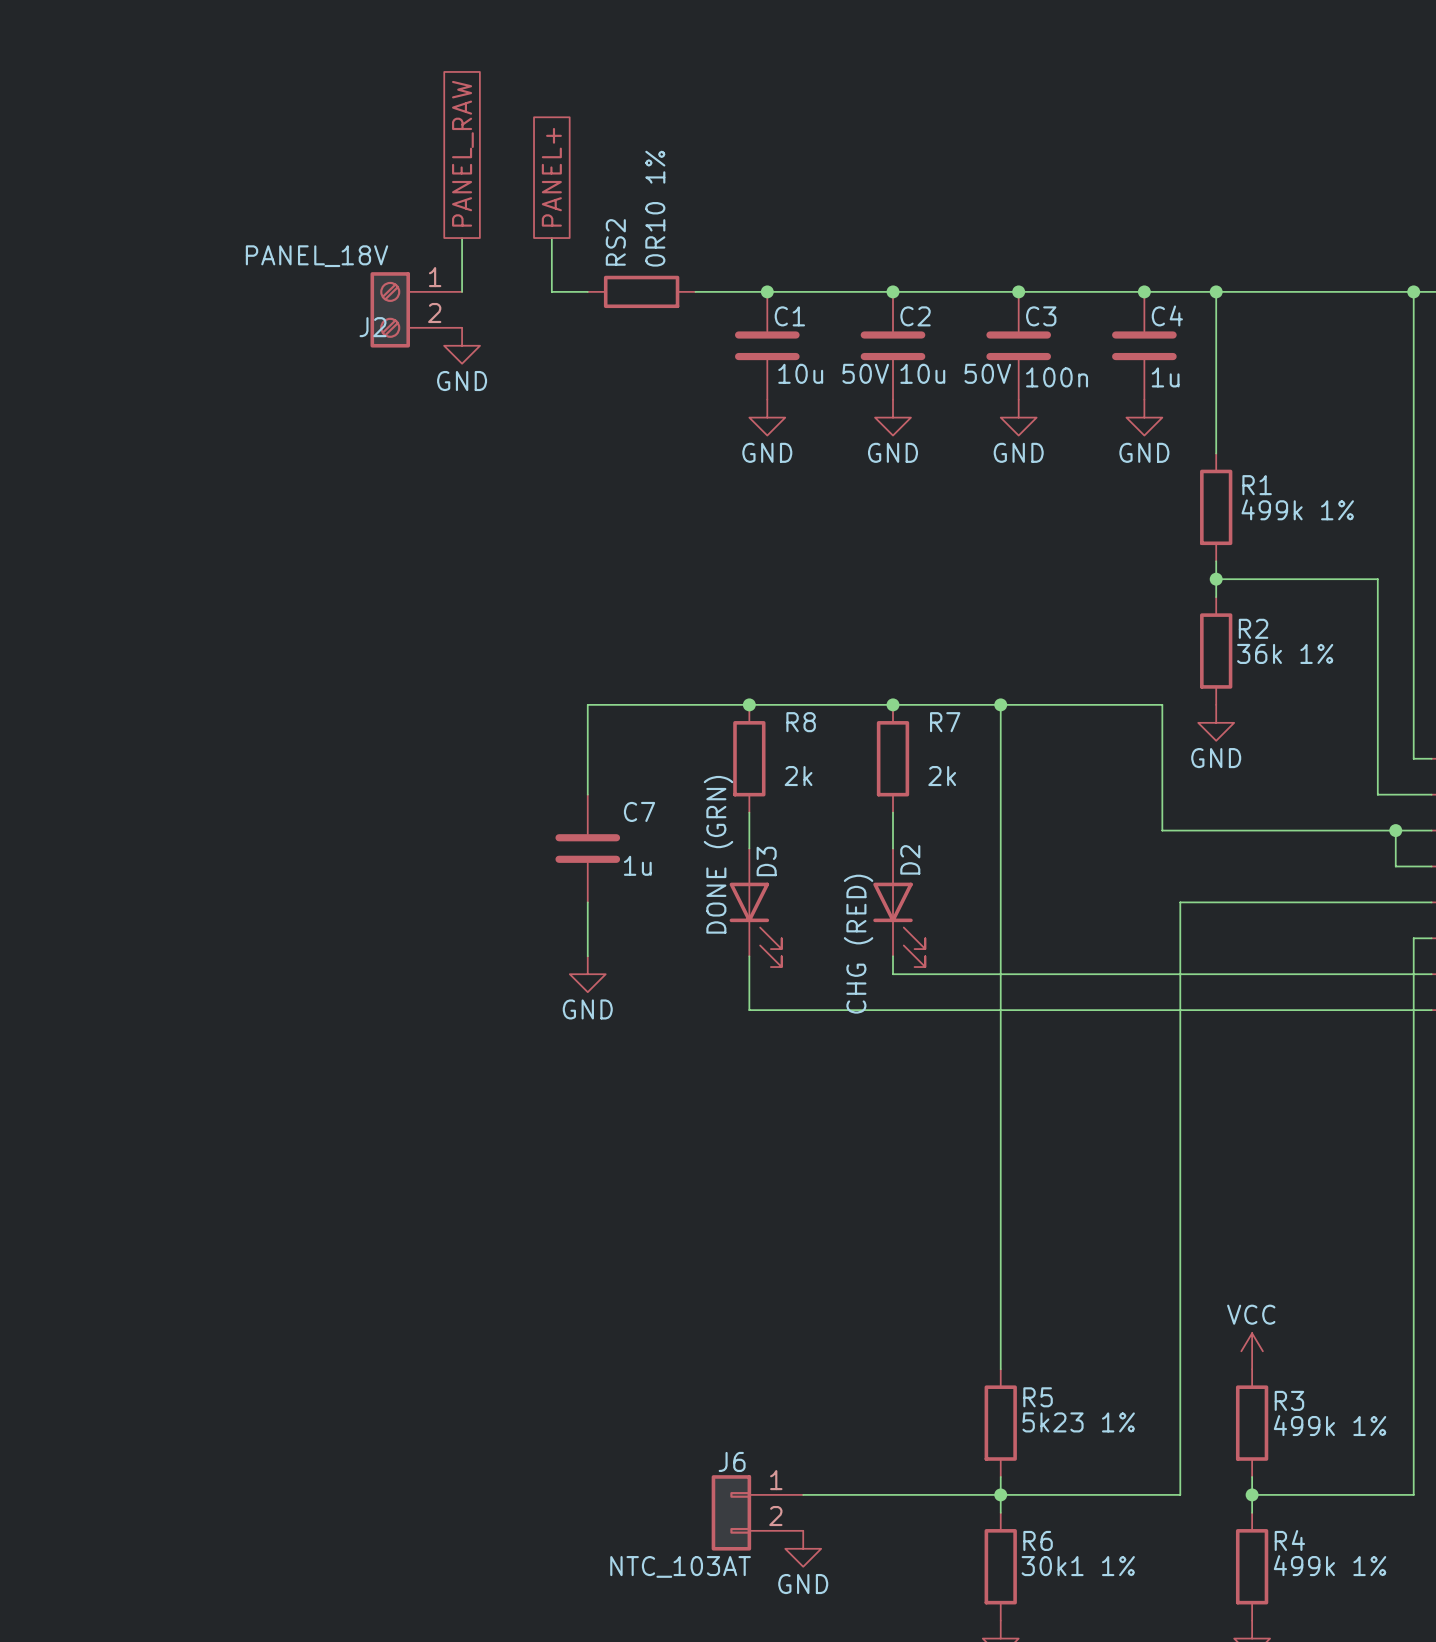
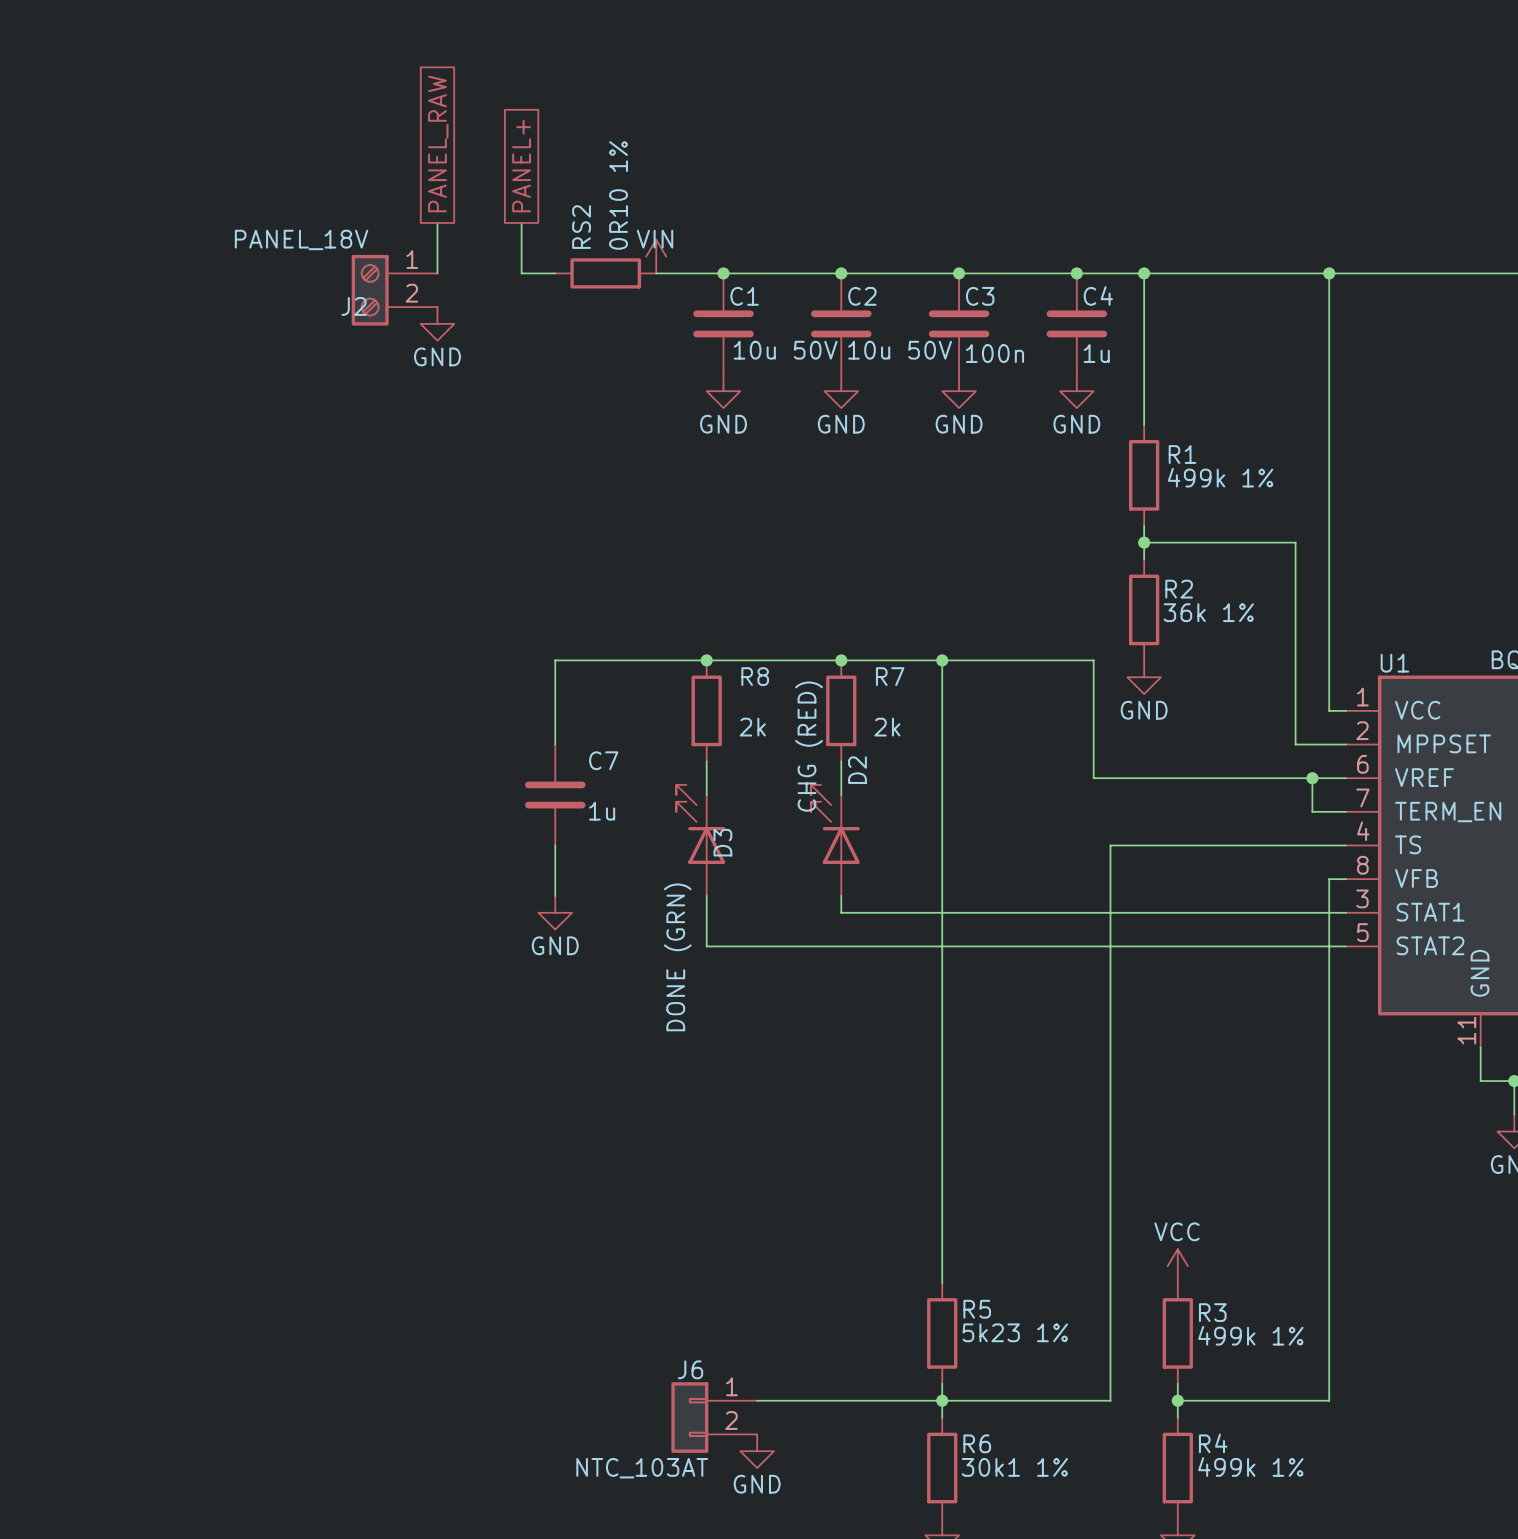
power symbol: none -> VIN (656, 256)
D3 value position: DONE (GRN) (718, 854) -> DONE (GRN) (677, 957)
D2 name position: D2 (910, 859) -> D2 (857, 770)
D3 name position: D3 (766, 861) -> D3 (722, 842)
D3 rotation: 0° (755, 924) -> 180° (700, 824)
D2 rotation: 0° (899, 924) -> 180° (835, 824)
D2 value position: CHG (RED) (858, 944) -> CHG (RED) (809, 746)

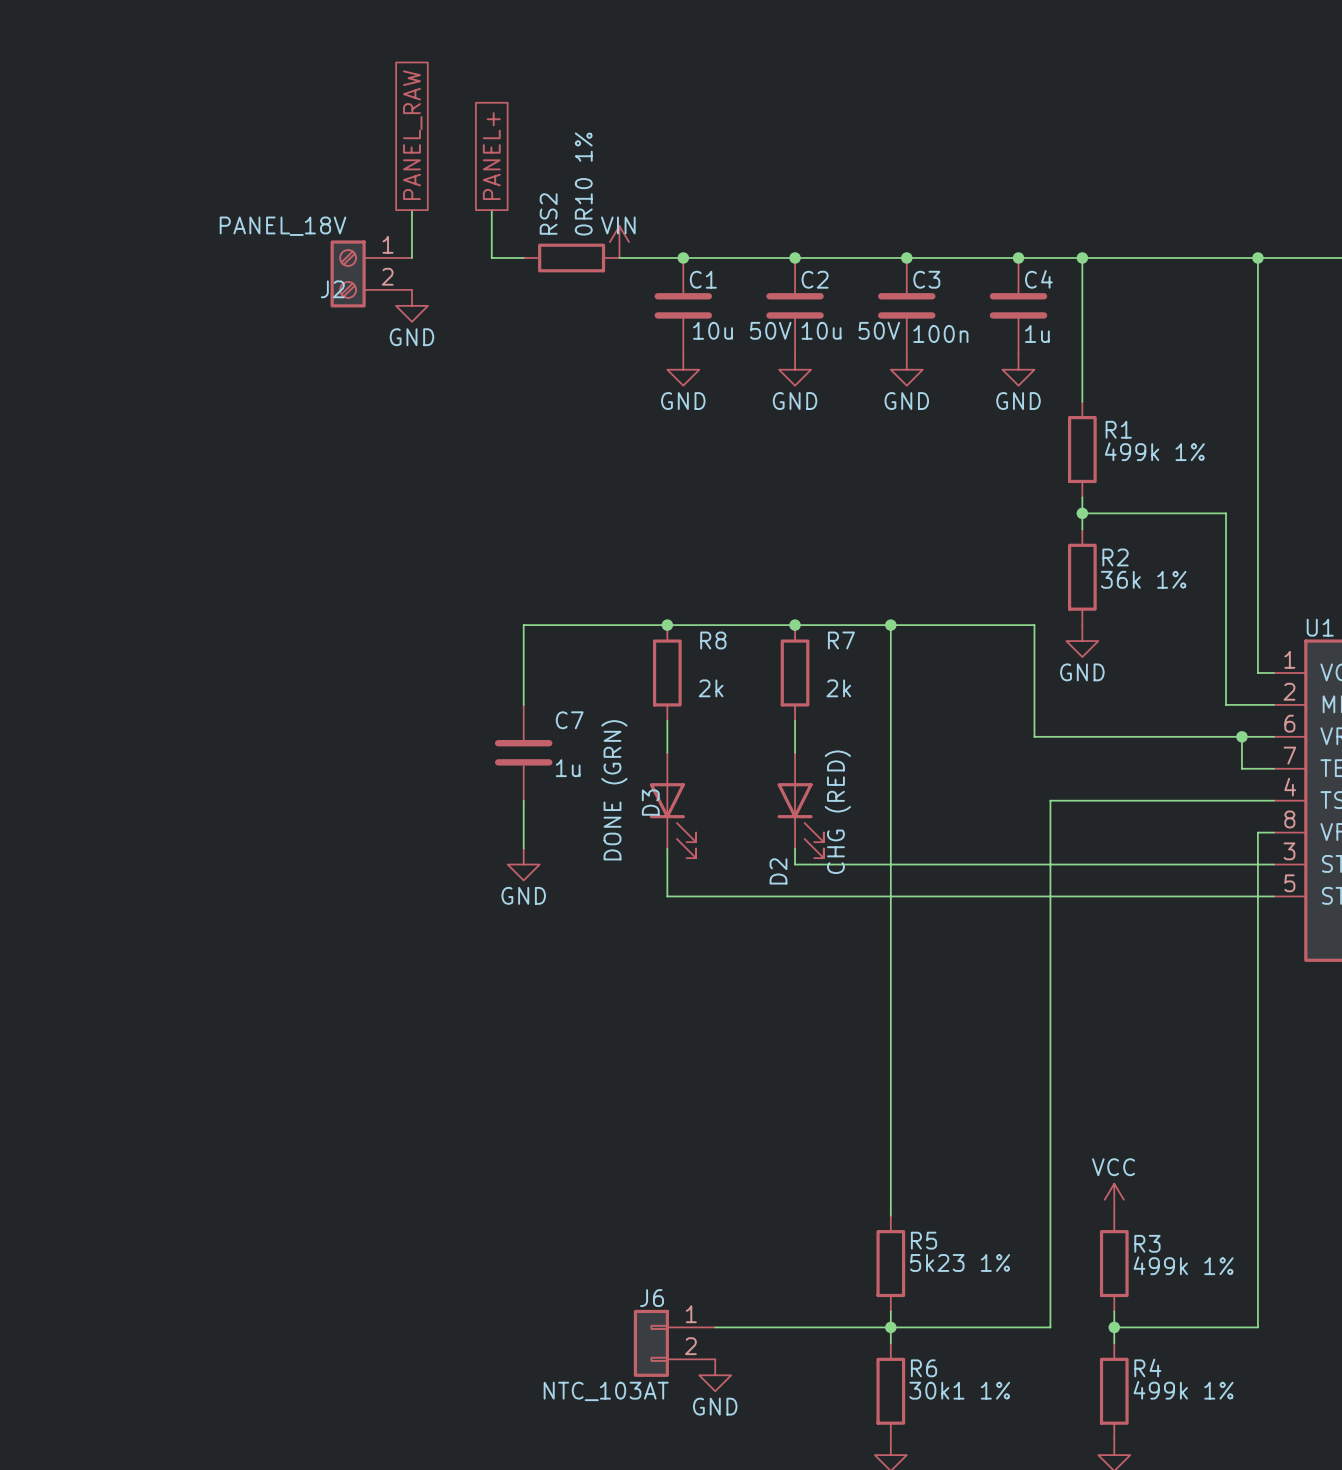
D2 value position: CHG (RED) (809, 746) -> CHG (RED) (837, 812)
D3 rotation: 0° (700, 824) -> 180° (672, 820)
D2 rotation: 0° (835, 824) -> 180° (800, 820)
D3 value position: DONE (GRN) (677, 957) -> DONE (GRN) (614, 790)

